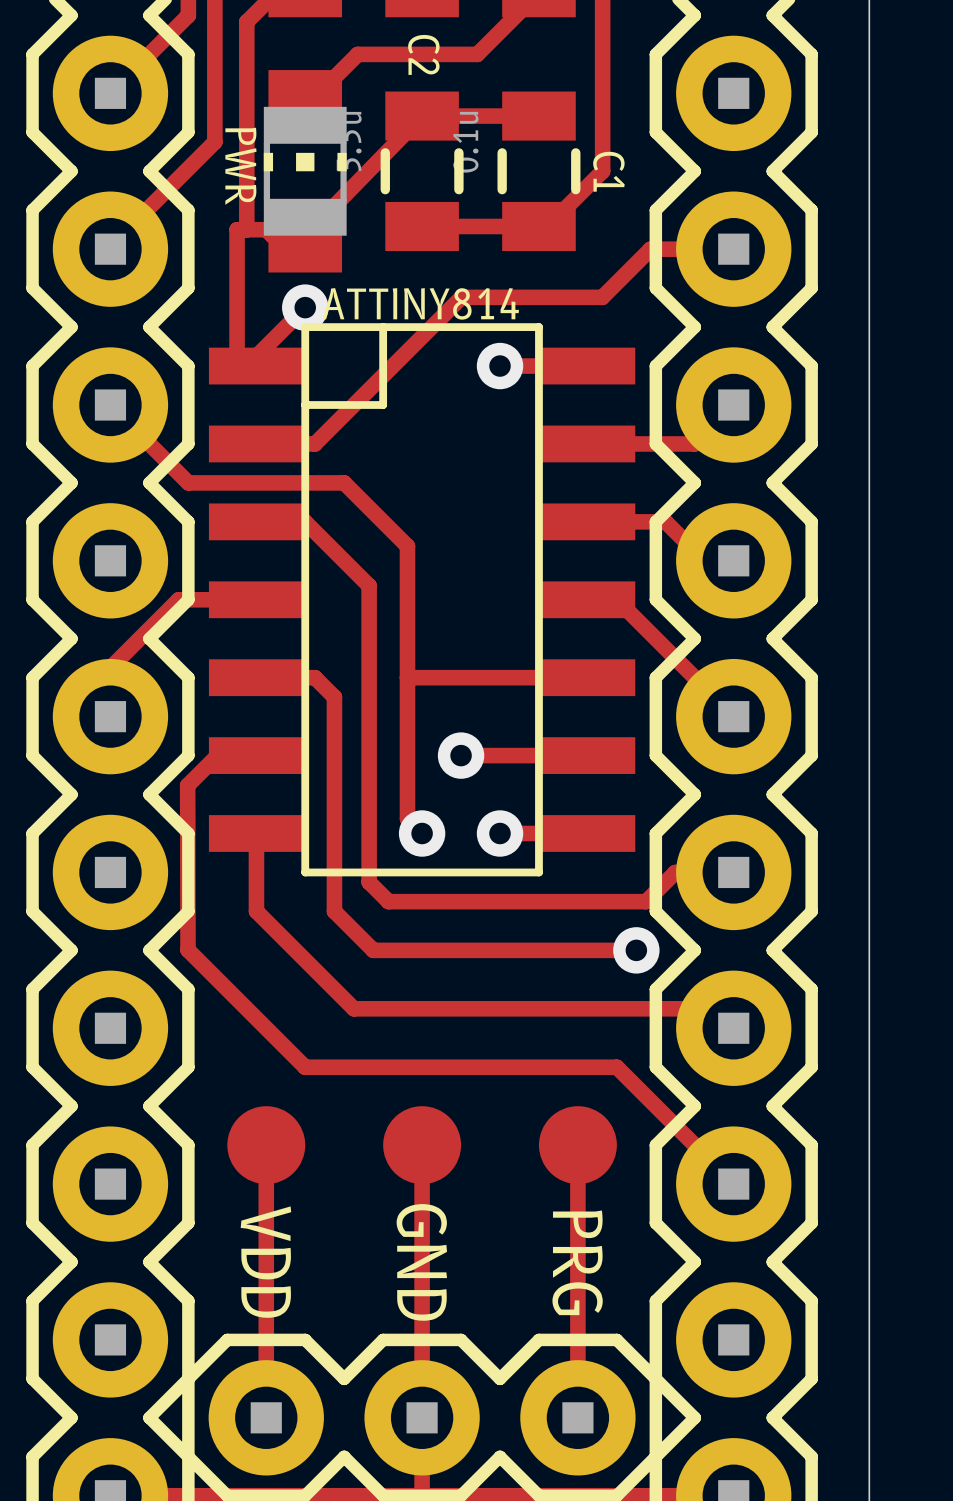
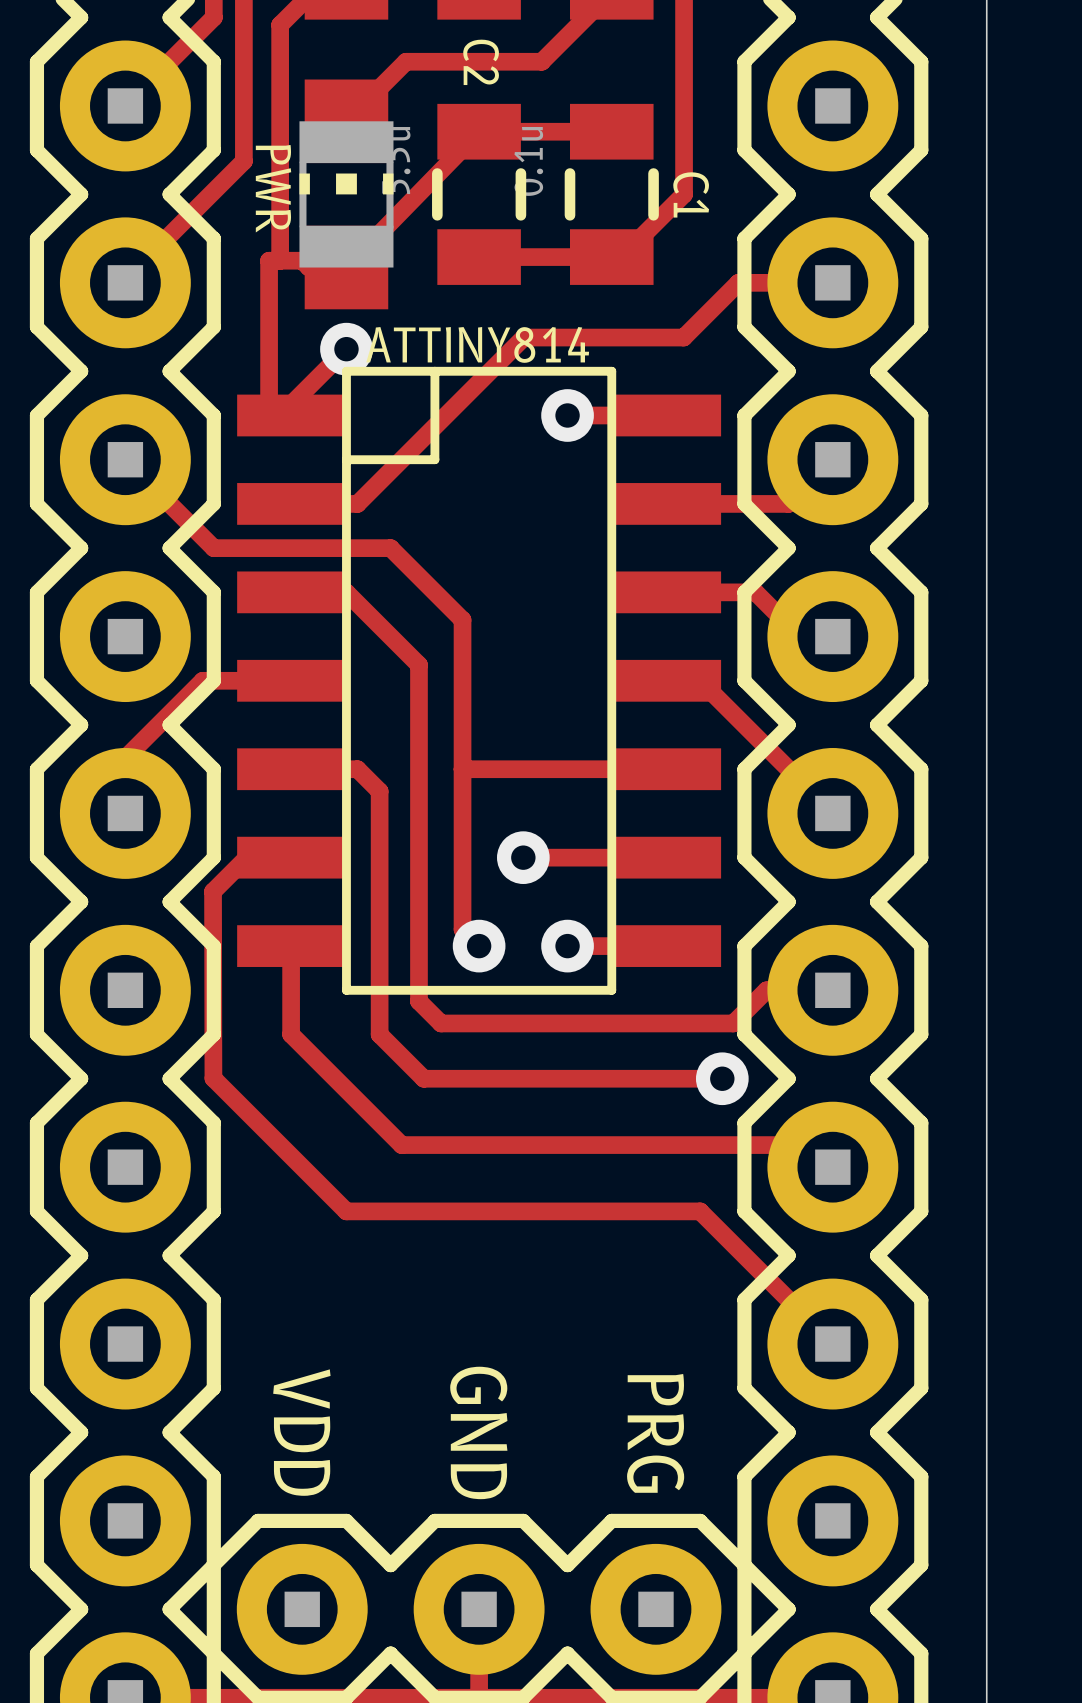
track: (266, 1145) (266, 1417) -> none
part: (266, 1145) -> none
track: (422, 1145) (422, 1417) -> none
part: (422, 1145) -> none
track: (577, 1145) (577, 1417) -> none
part: (577, 1145) -> none

